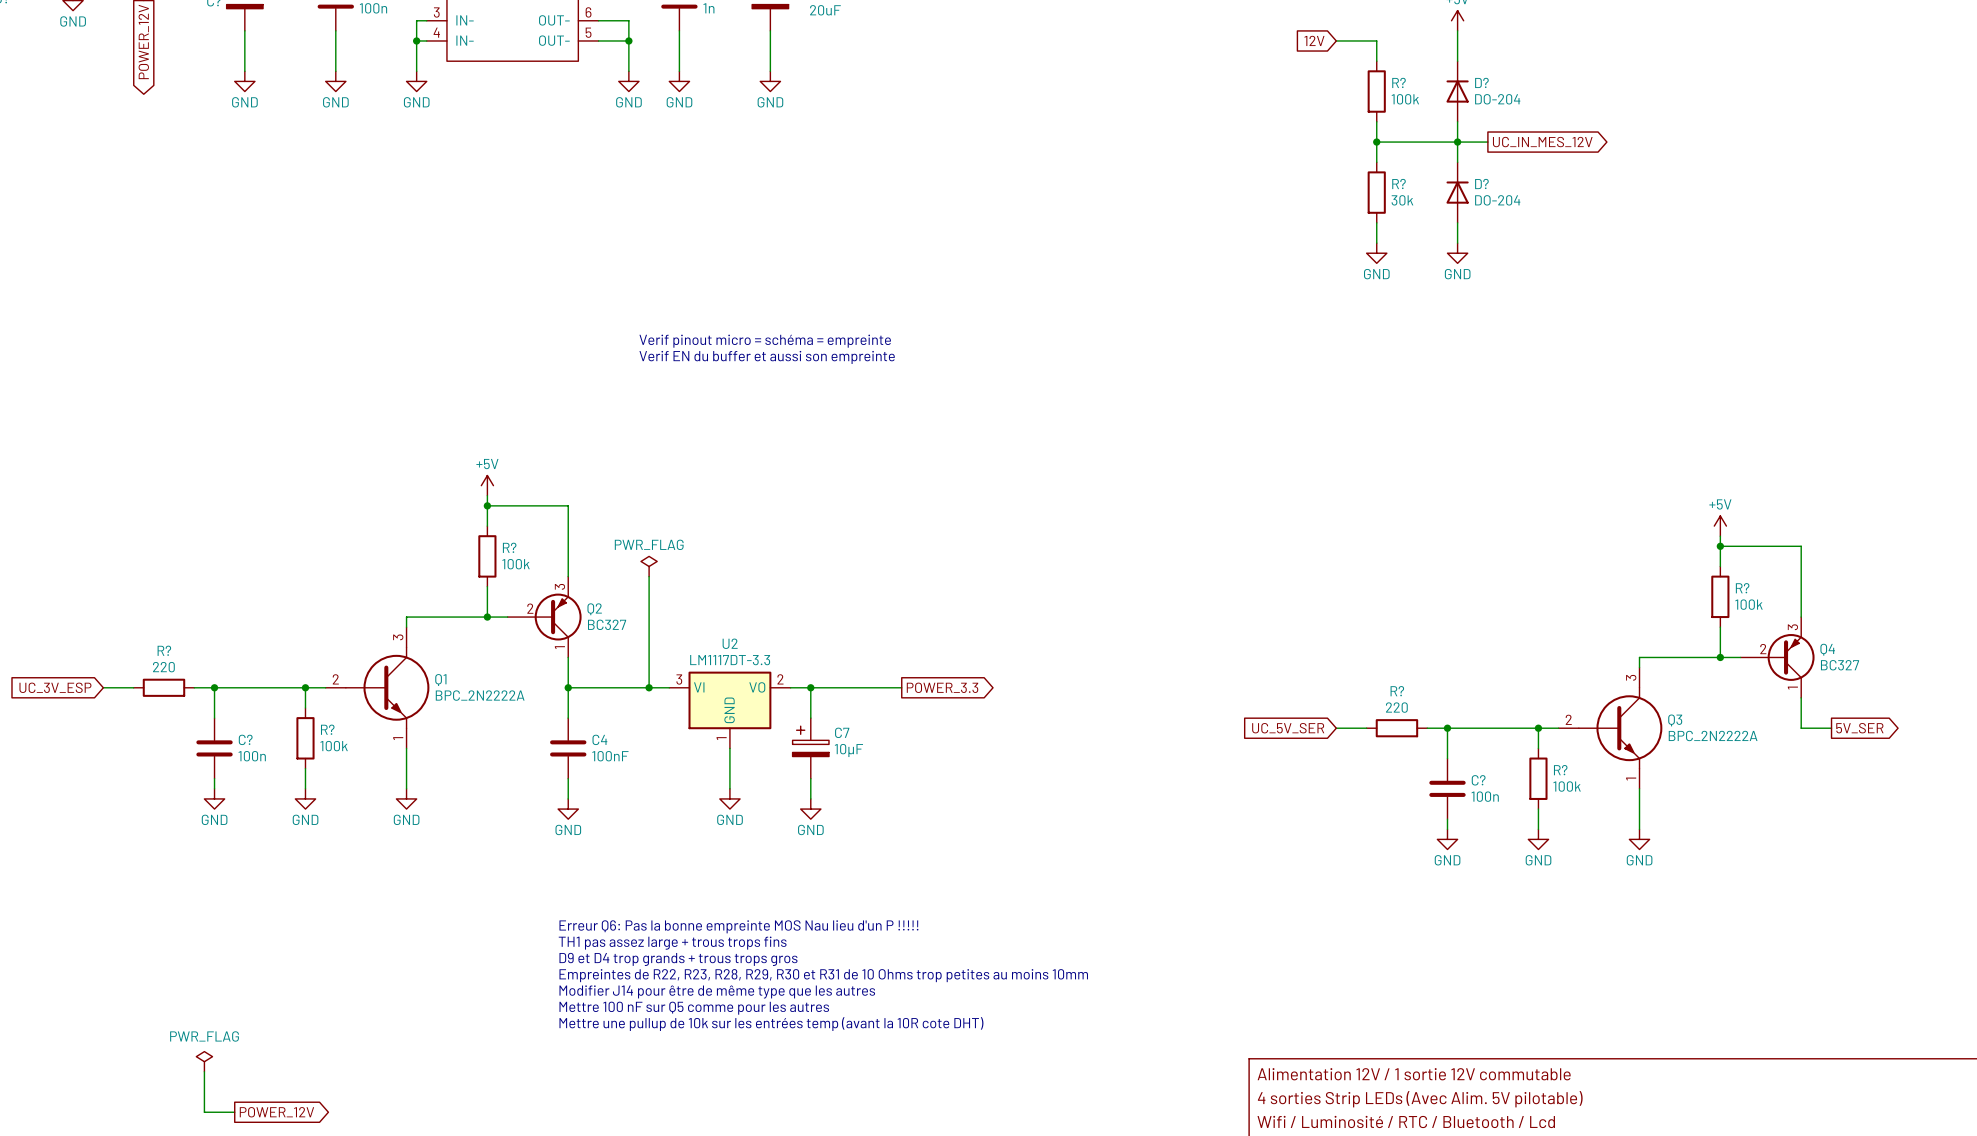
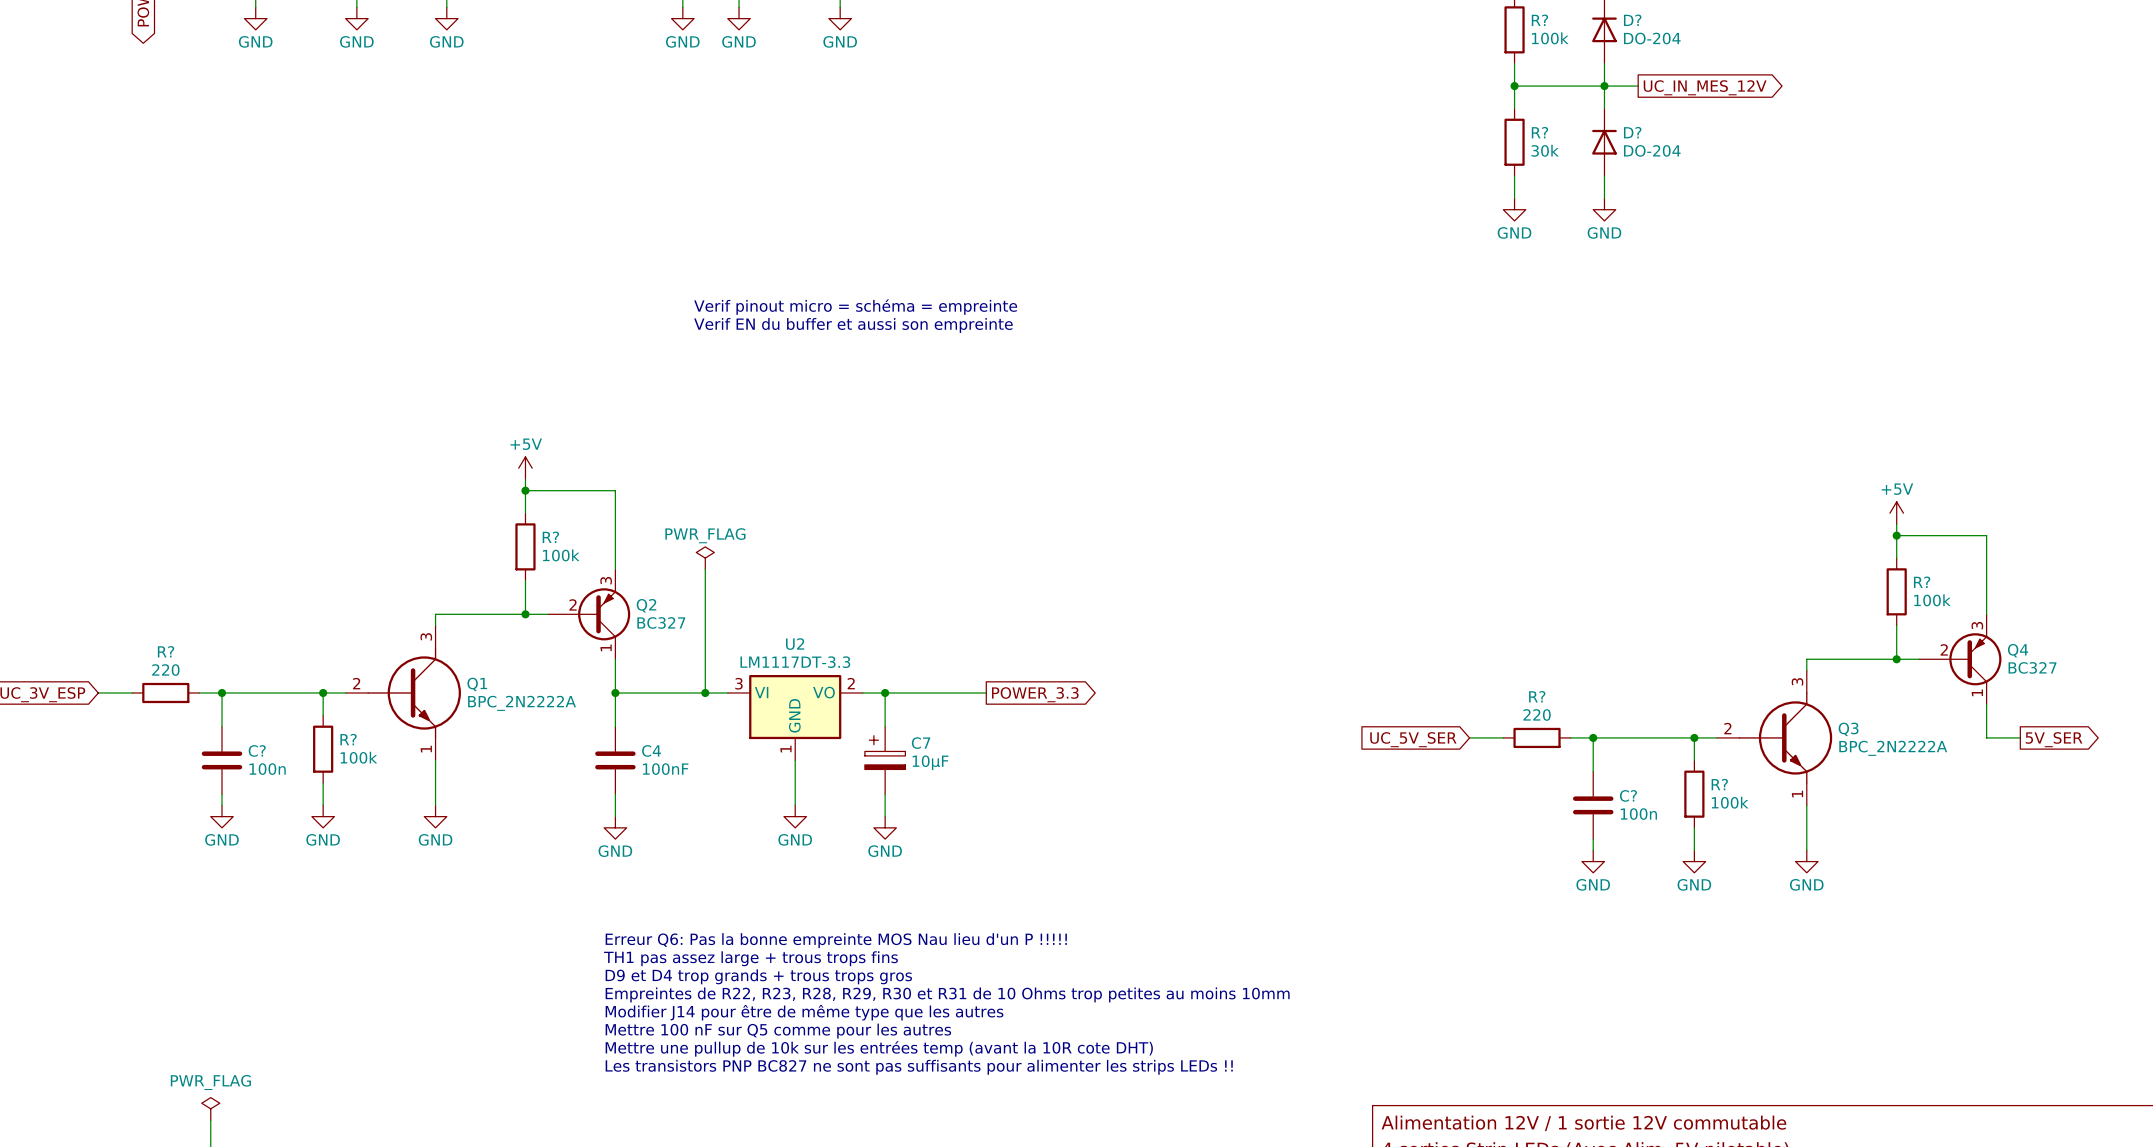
text: none -> Erreur Q6: Pas la bonne empreinte MOS Nau lieu d'un P !!!!! (836, 940)
text: Erreur Q6: Pas la bonne empreinte MOS Nau lieu d'un P !!!!! (738, 926) -> TH1 pas assez large + trous trops fins (750, 958)
text: TH1 pas assez large + trous trops fins (672, 943) -> D9 et D4 trop grands + trous trops gros (758, 976)
text: D9 et D4 trop grands + trous trops gros (678, 959) -> Empreintes de R22, R23, R28, R29, R30 et R31 de 10 Ohms trop petites au moins 10mm (947, 994)
text: Empreintes de R22, R23, R28, R29, R30 et R31 de 10 Ohms trop petites au moins 10mm (823, 975) -> Modifier J14 pour être de même type que les autres (804, 1012)
text: Modifier J14 pour être de même type que les autres (717, 991) -> Mettre 100 nF sur Q5 comme pour les autres (778, 1031)
text: Mettre 100 nF sur Q5 comme pour les autres (694, 1008) -> Mettre une pullup de 10k sur les entrées temp (avant la 10R cote DHT) (879, 1048)
text: Mettre une pullup de 10k sur les entrées temp (avant la 10R cote DHT) (771, 1024) -> Les transistors PNP BC827 ne sont pas suffisants pour alimenter les strips LEDs !! (919, 1067)

